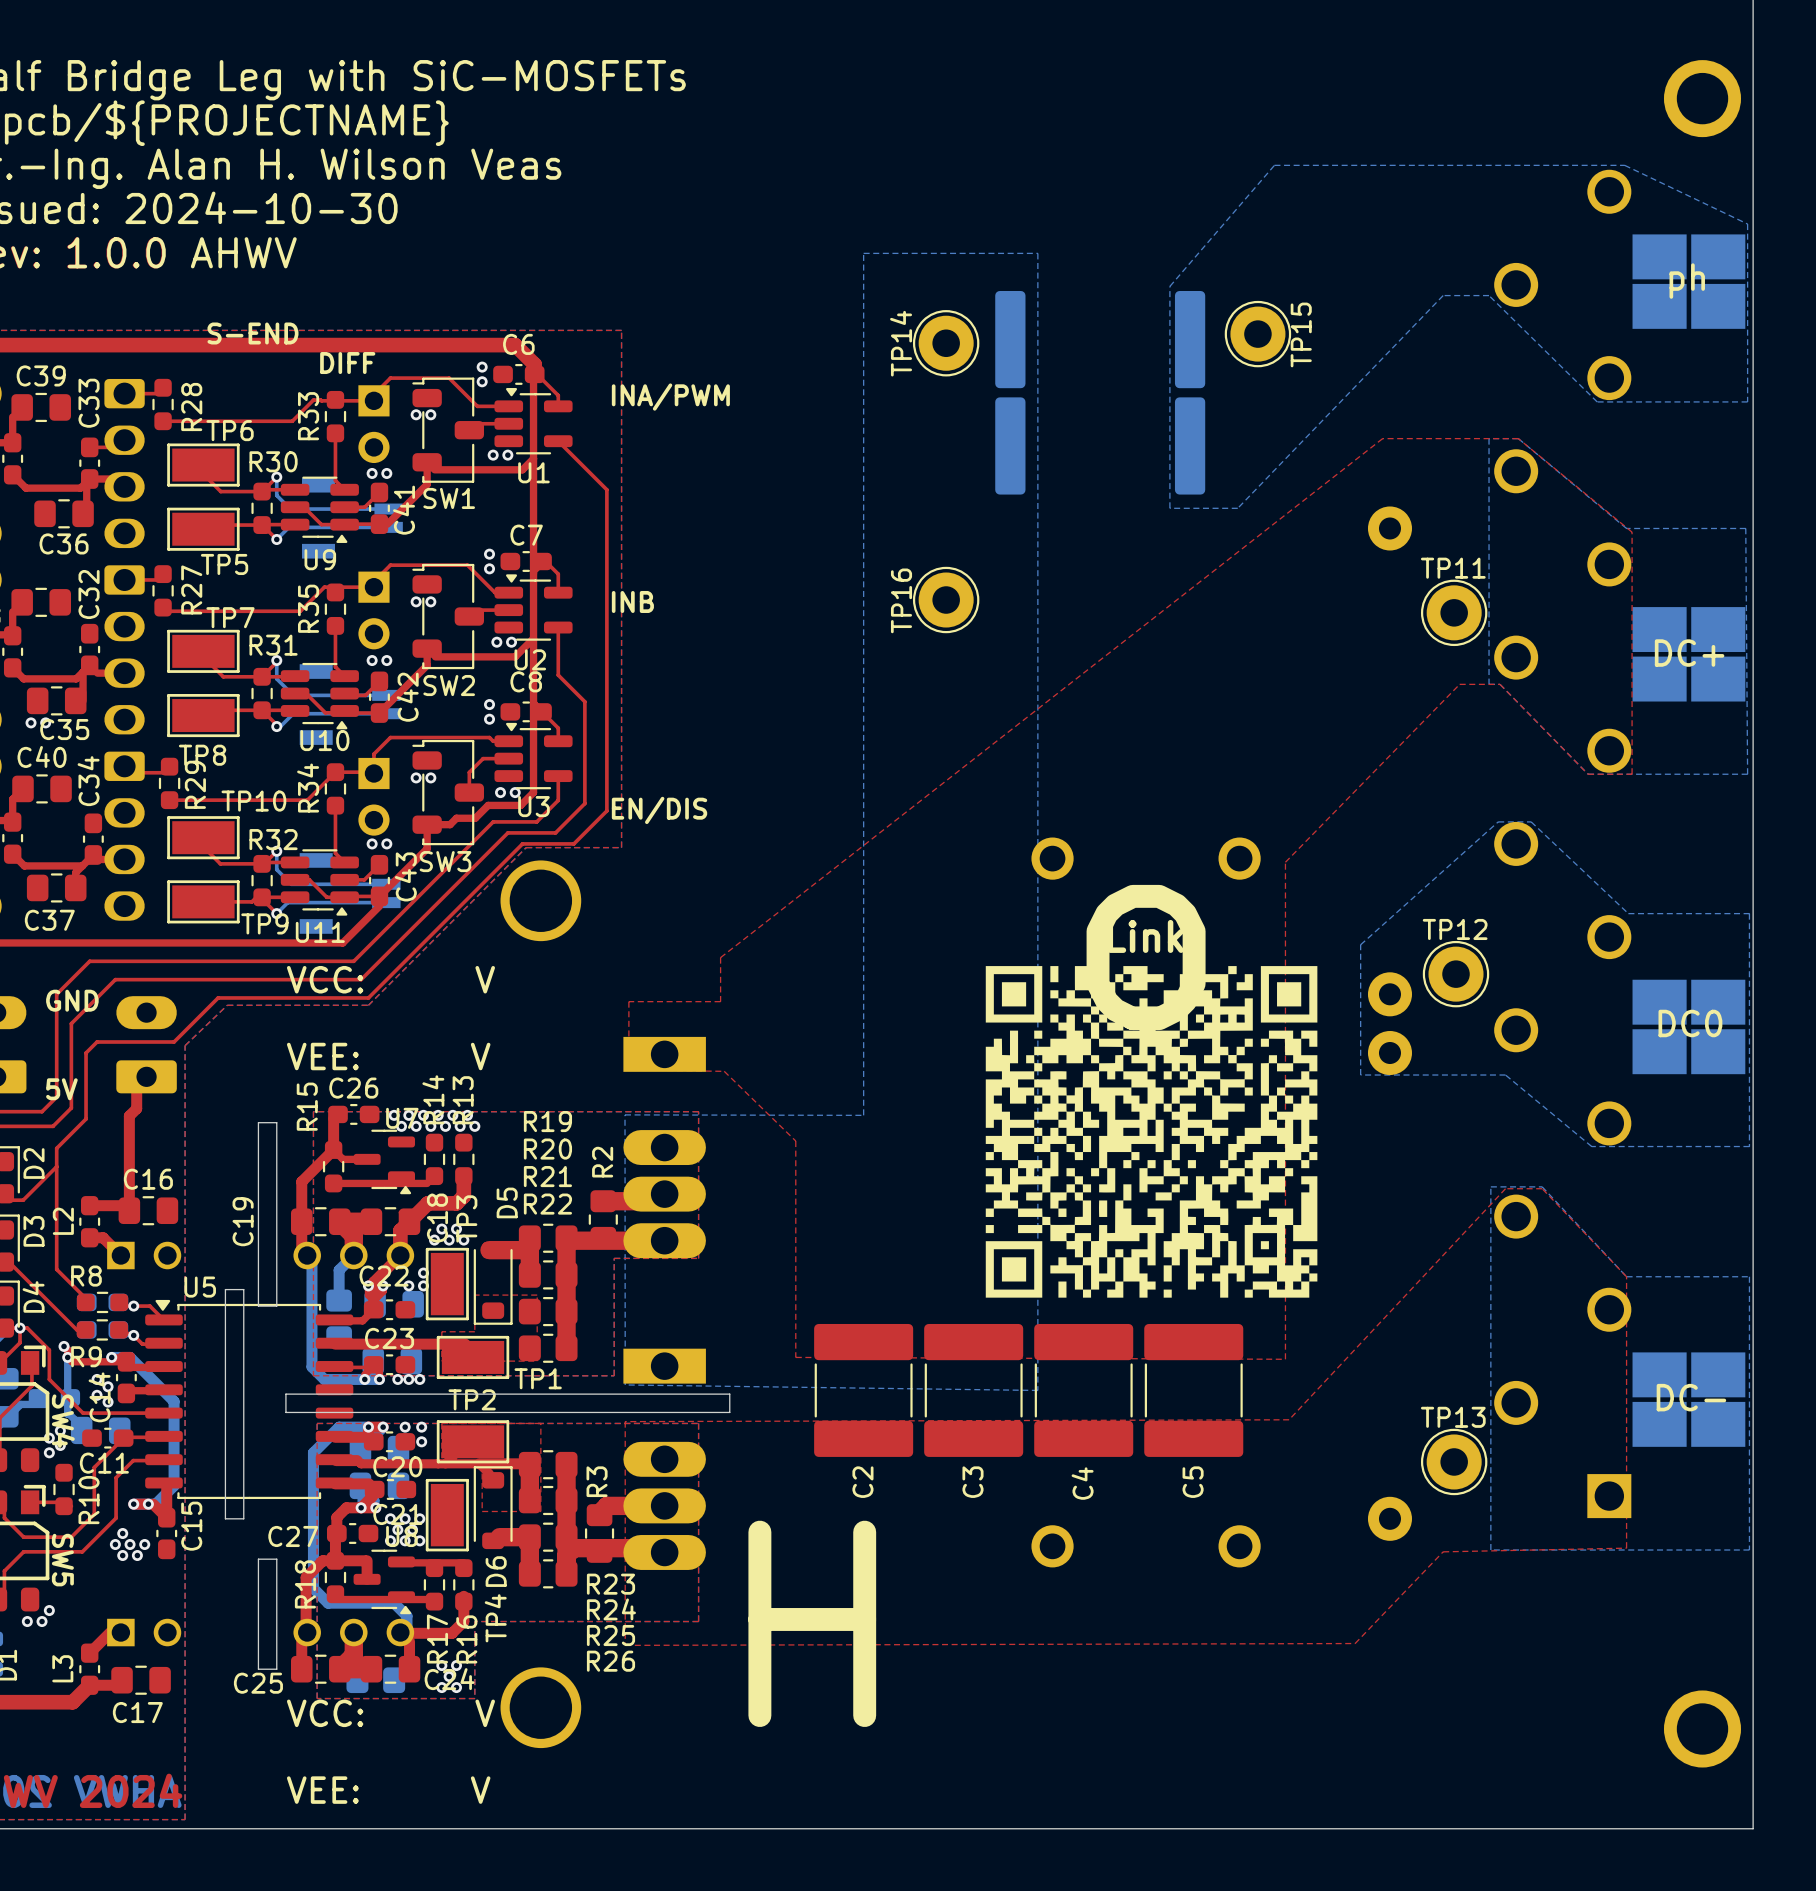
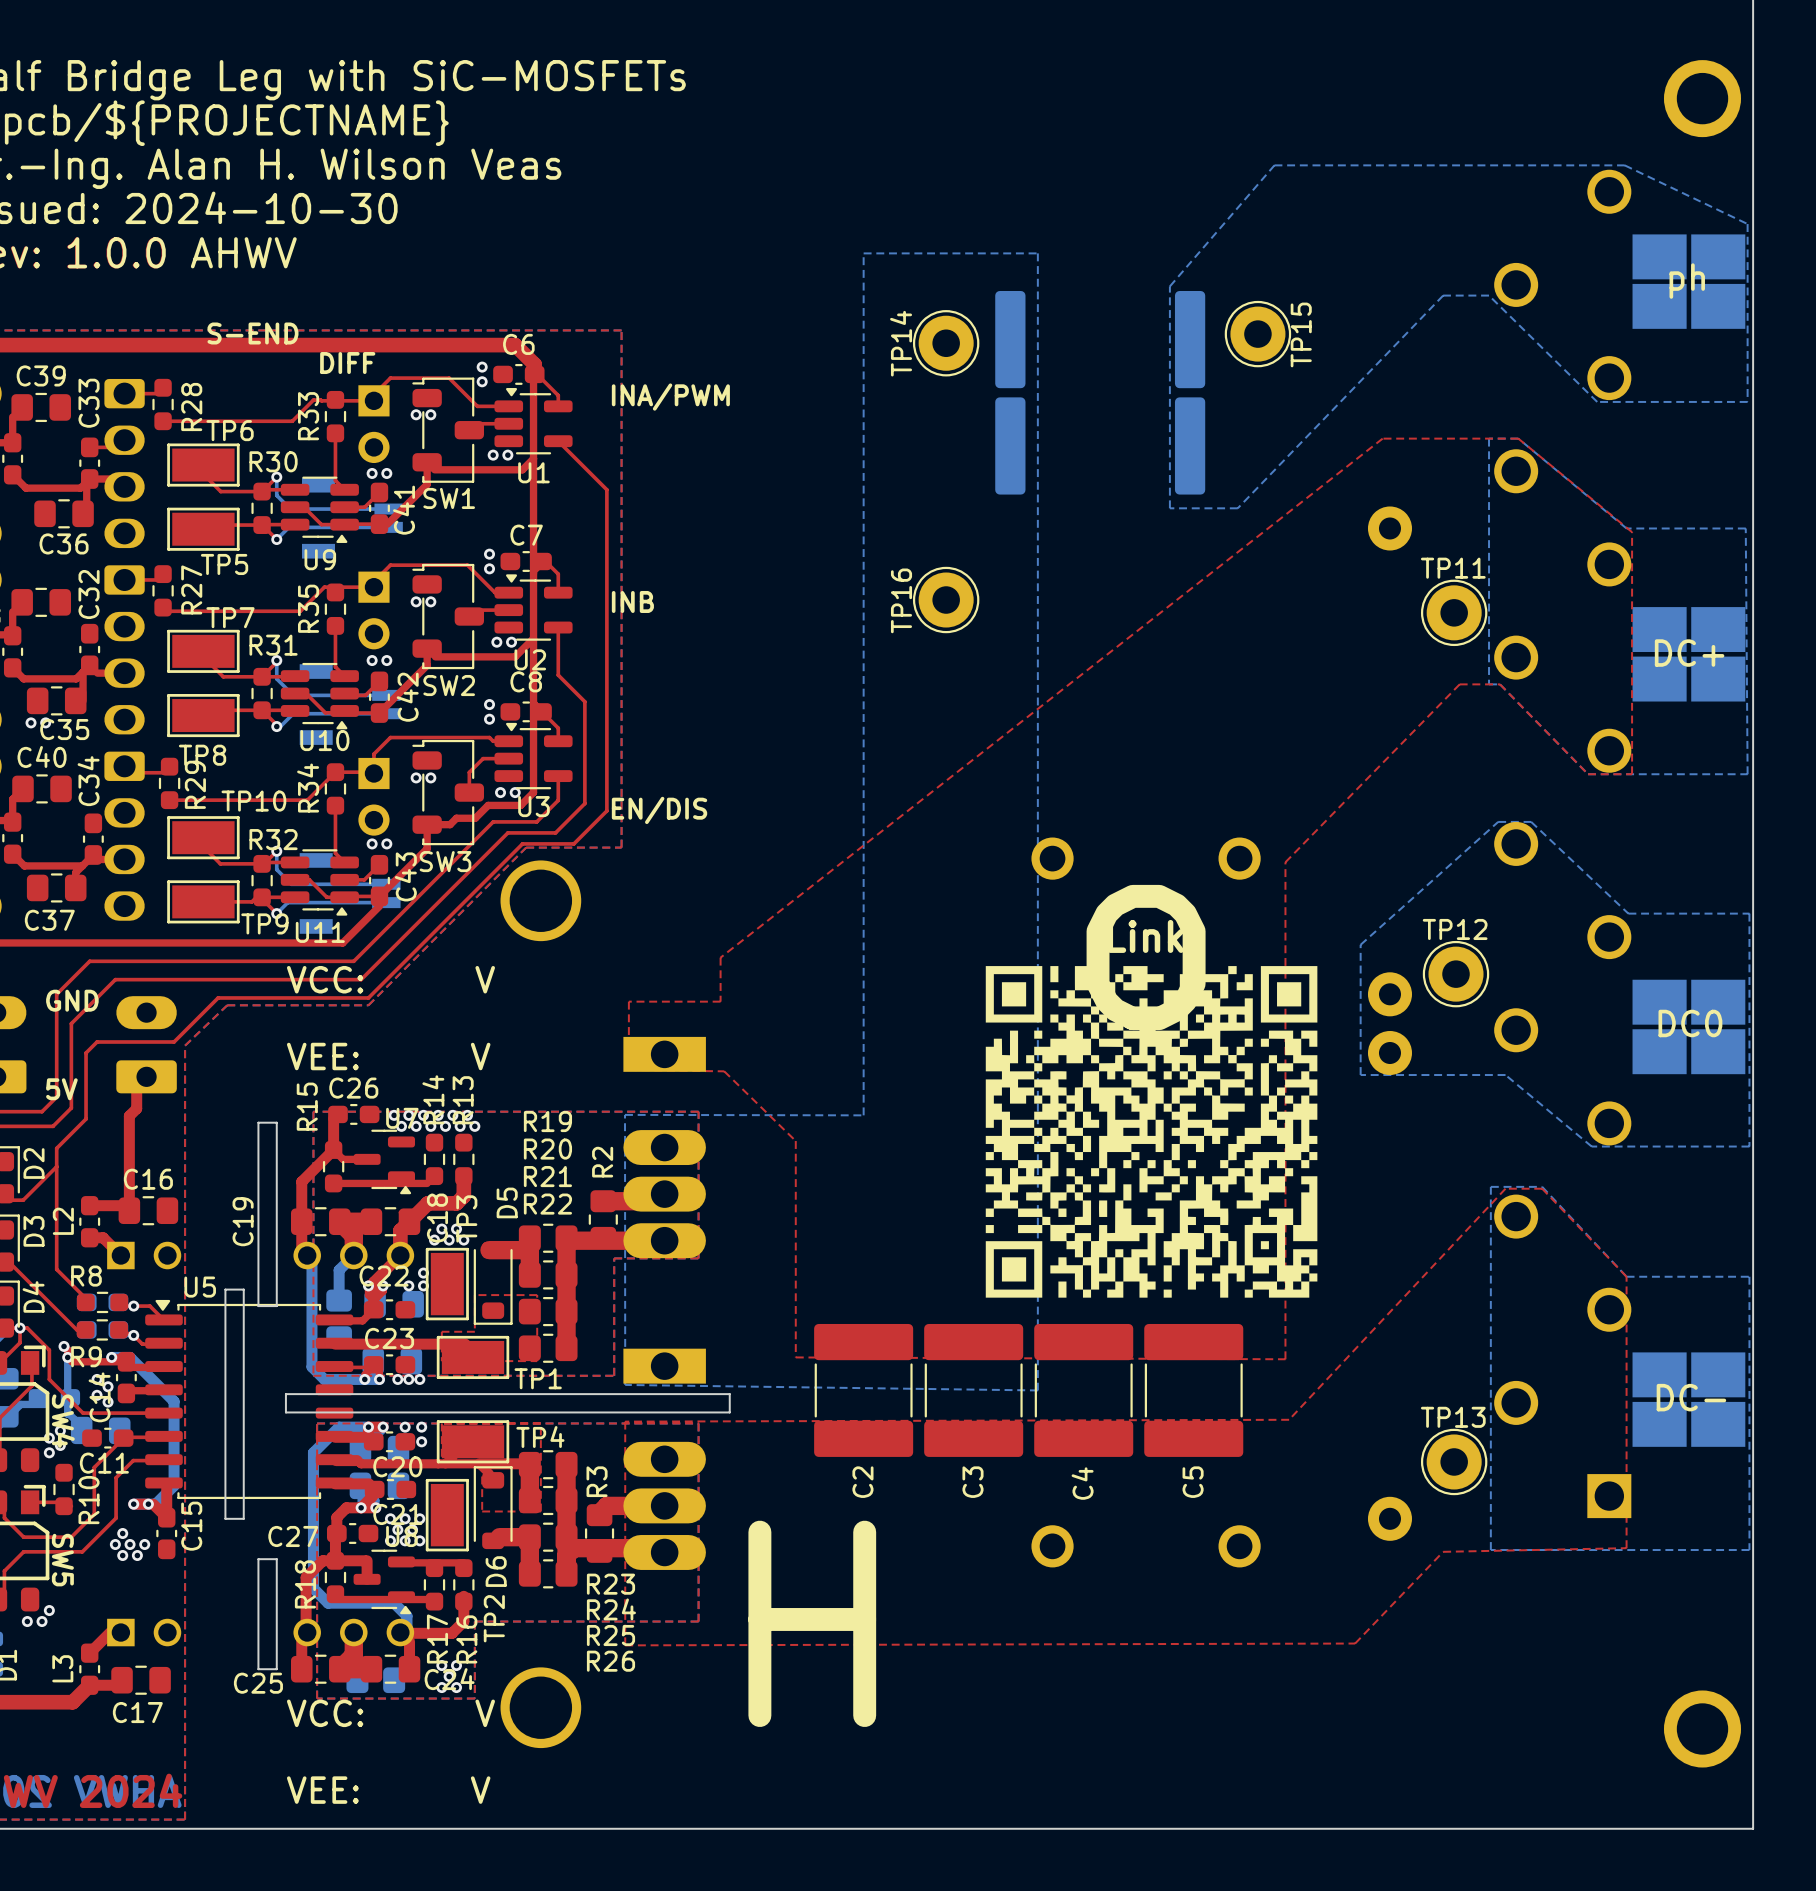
TP2 name rotation: 0° (472, 1399) -> 90° counterclockwise (494, 1618)
TP2 name position: TP2 (472, 1399) -> TP2 (494, 1618)
TP4 name rotation: 0° (495, 1618) -> 90° clockwise (540, 1437)
TP4 name position: TP4 (495, 1618) -> TP4 (540, 1437)

